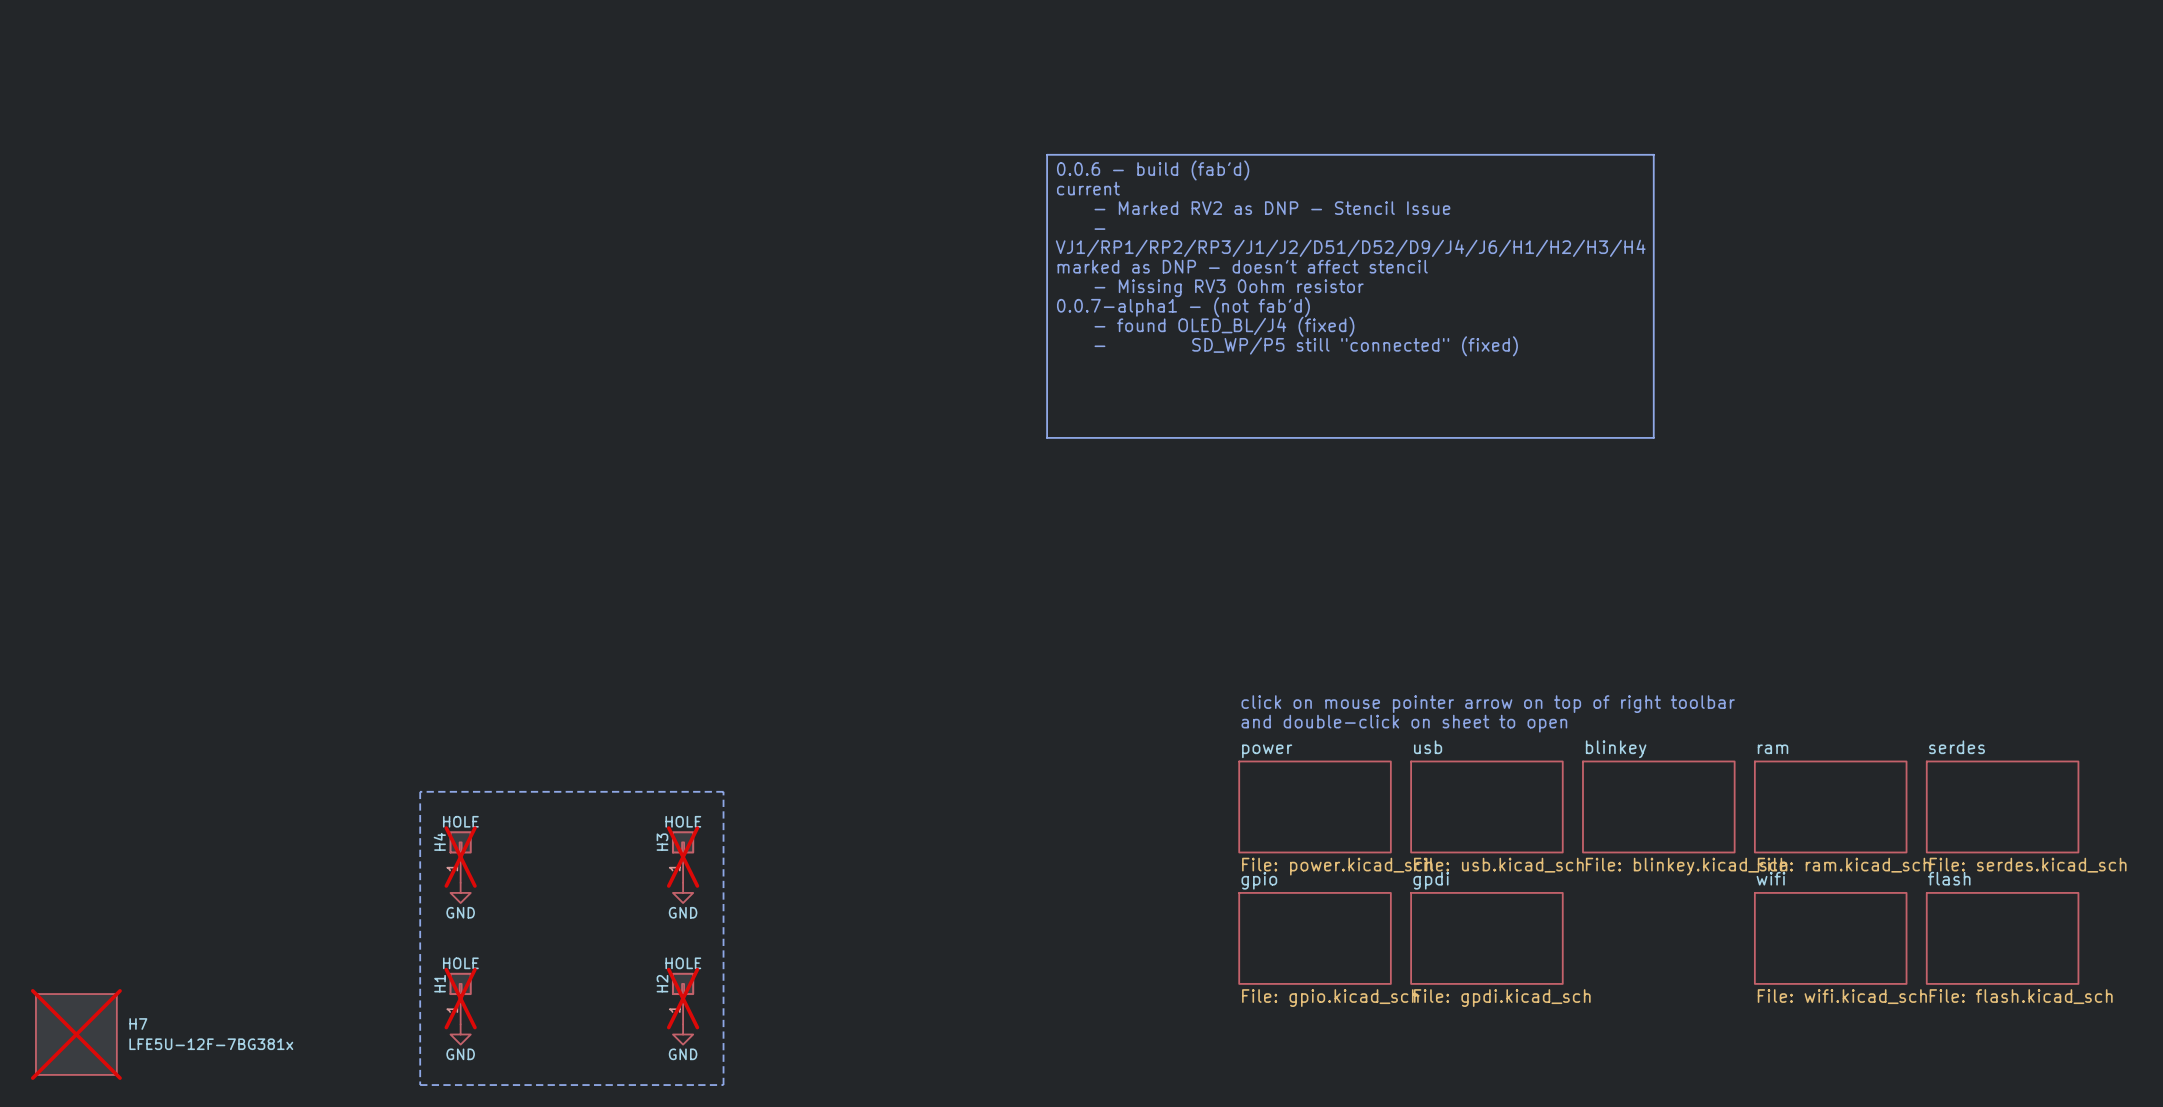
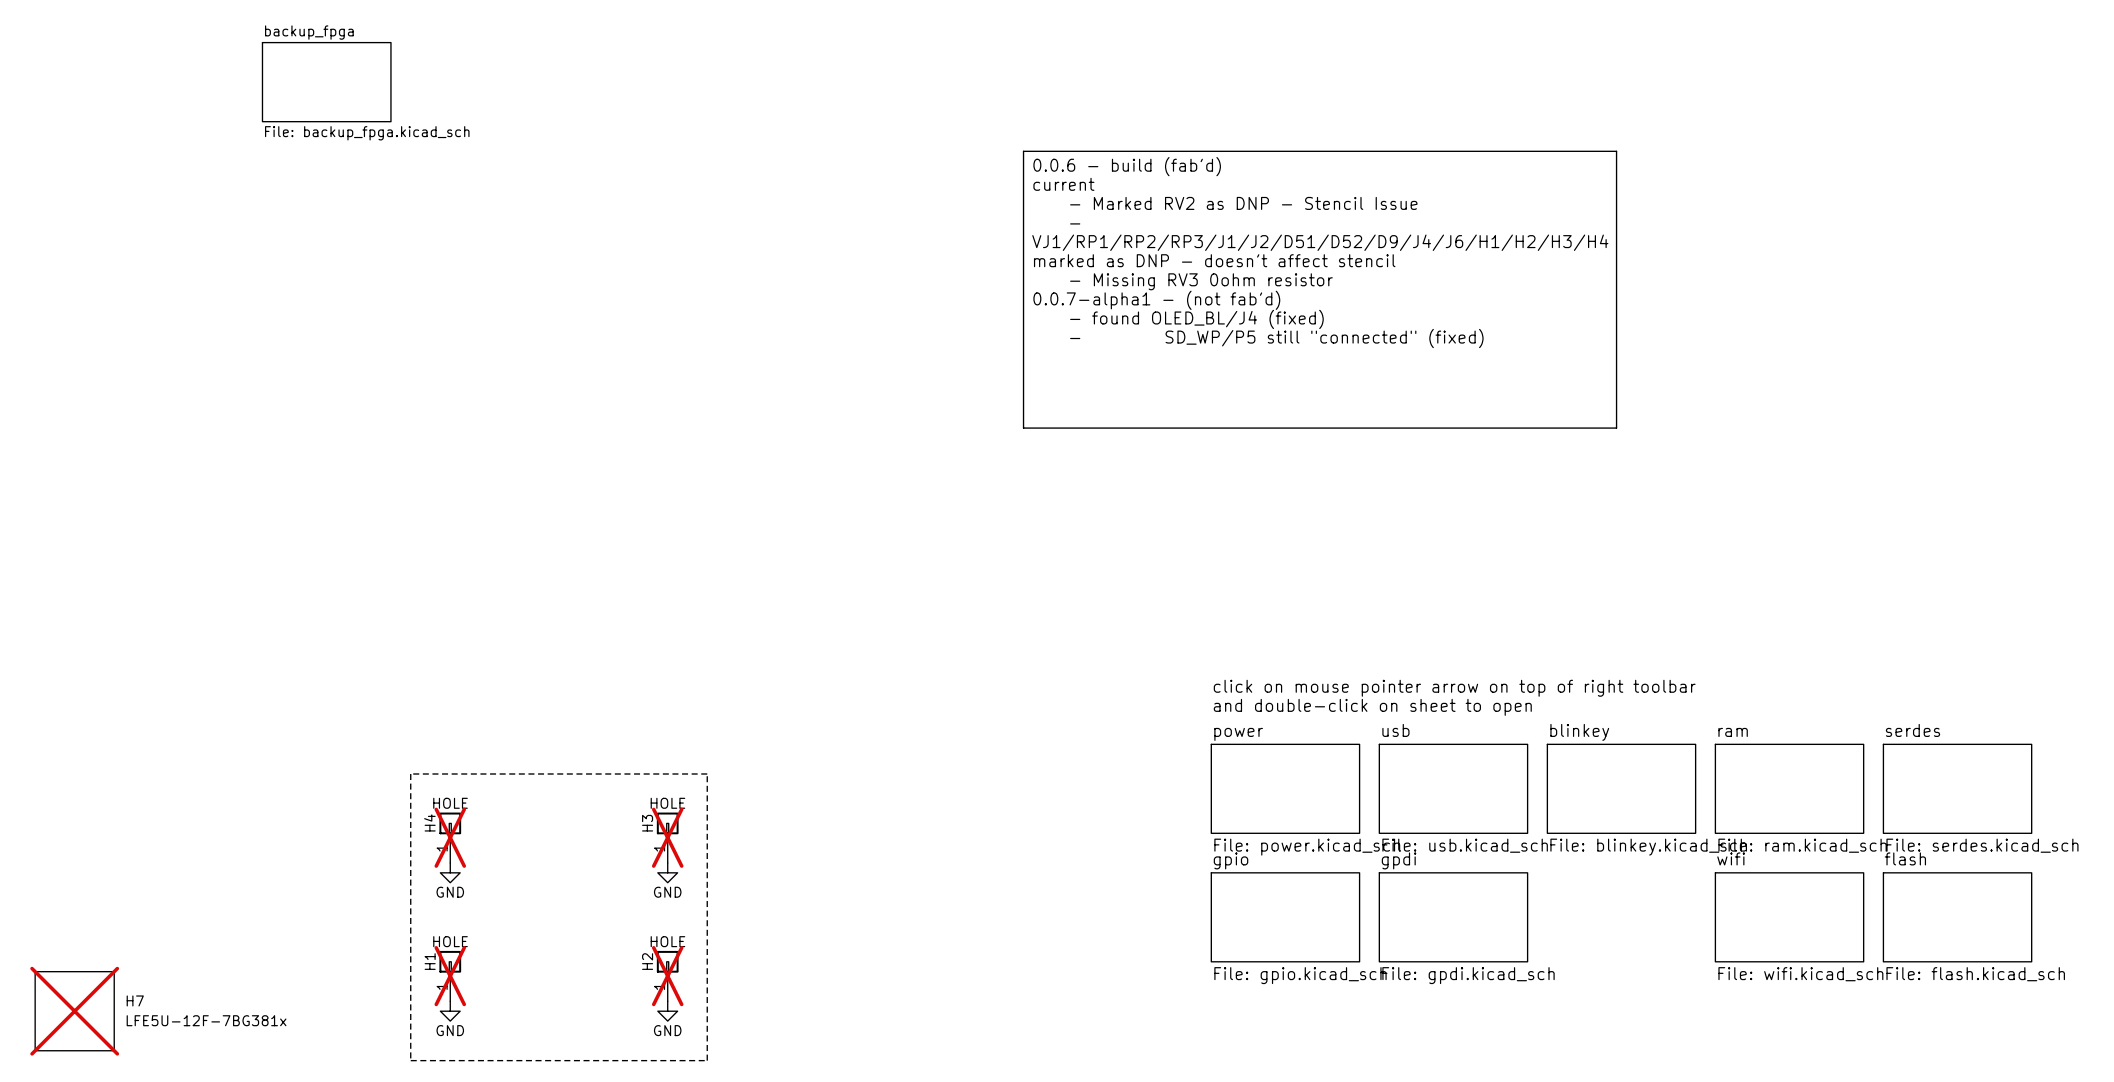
sheet backup_fpga: none -> File: backup_fpga.kicad_sch (326, 82)

